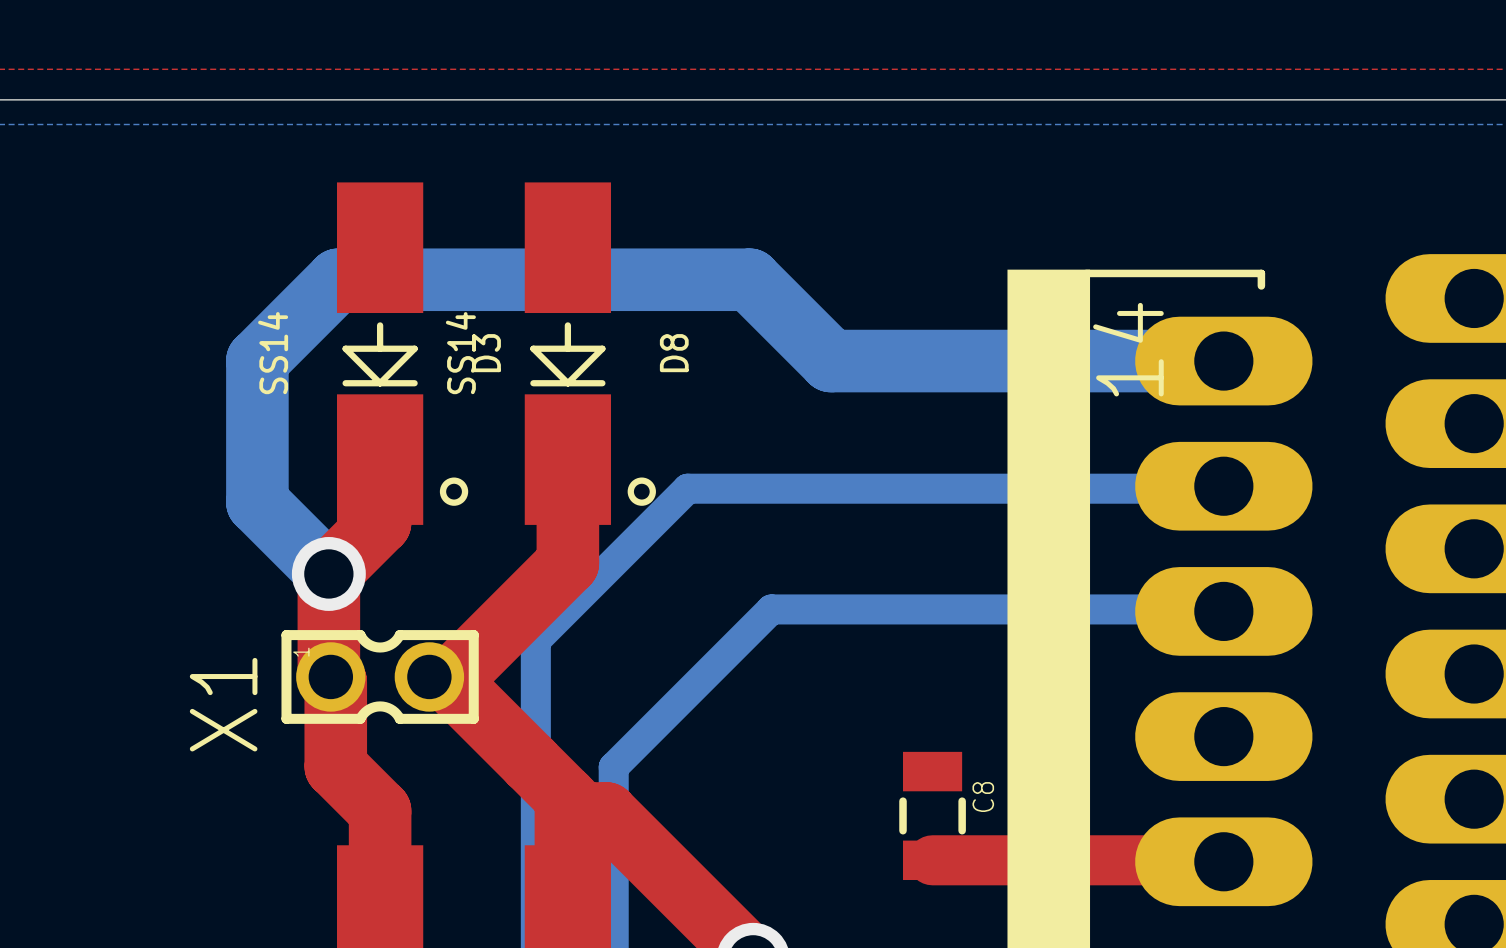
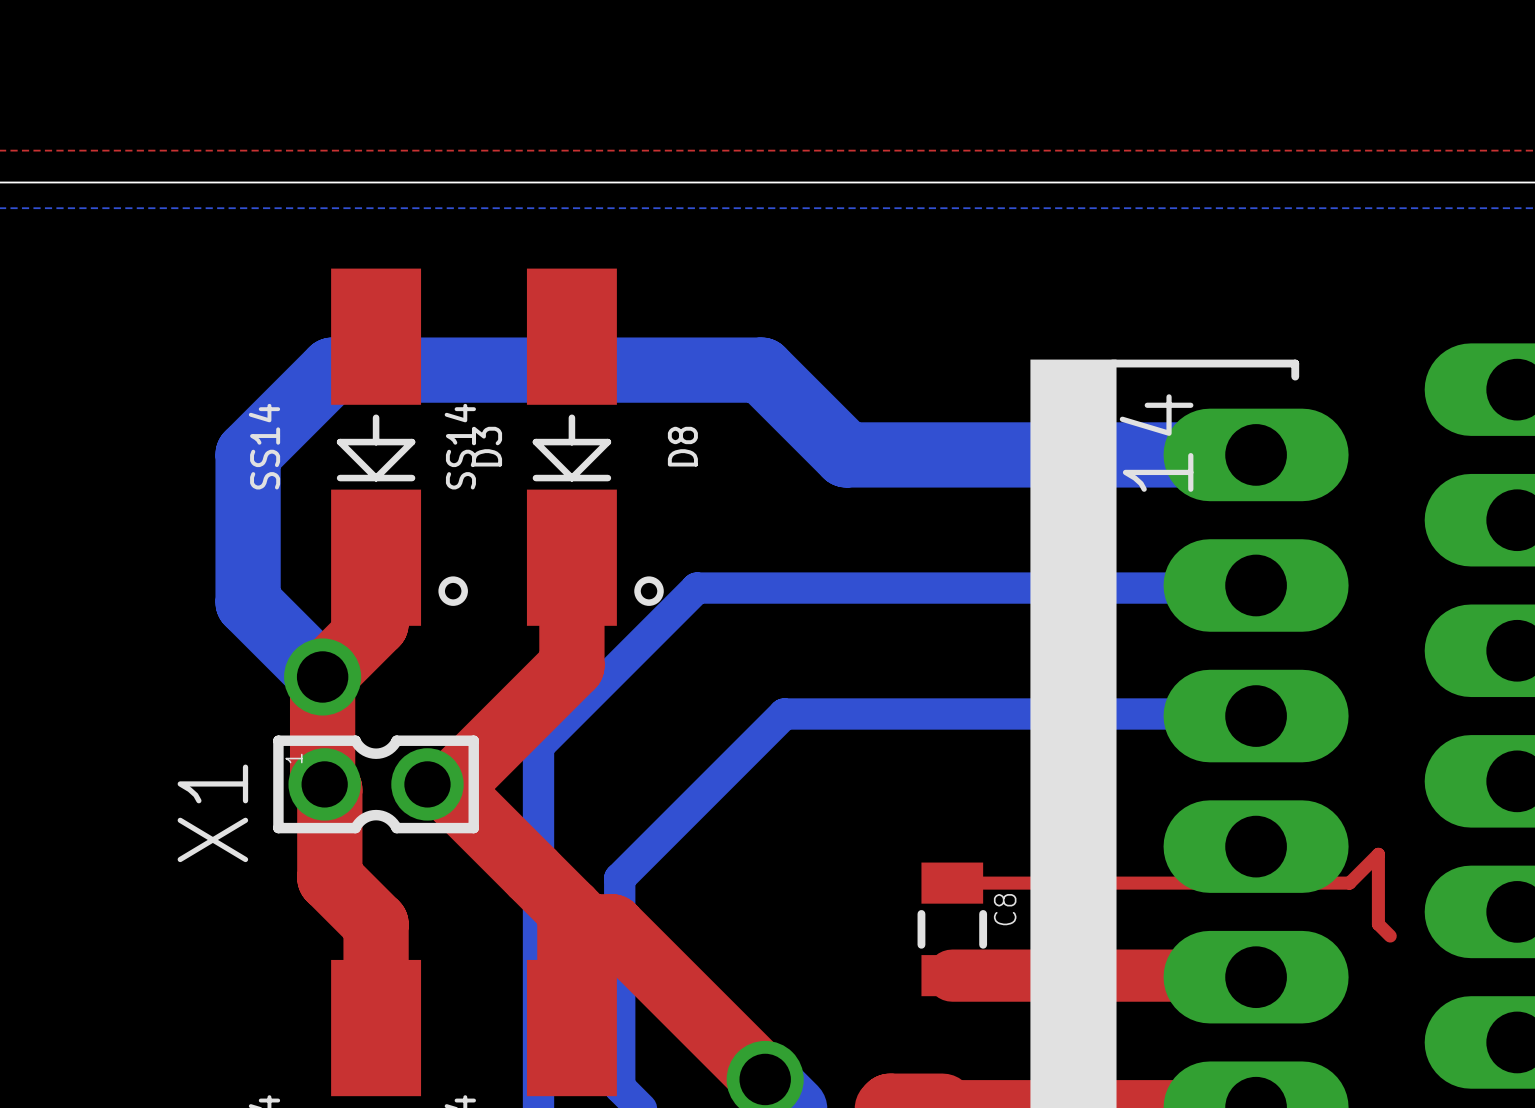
top track: none -> (952, 883) (1349, 883) (1378, 854) (1378, 924) (1390, 936)

